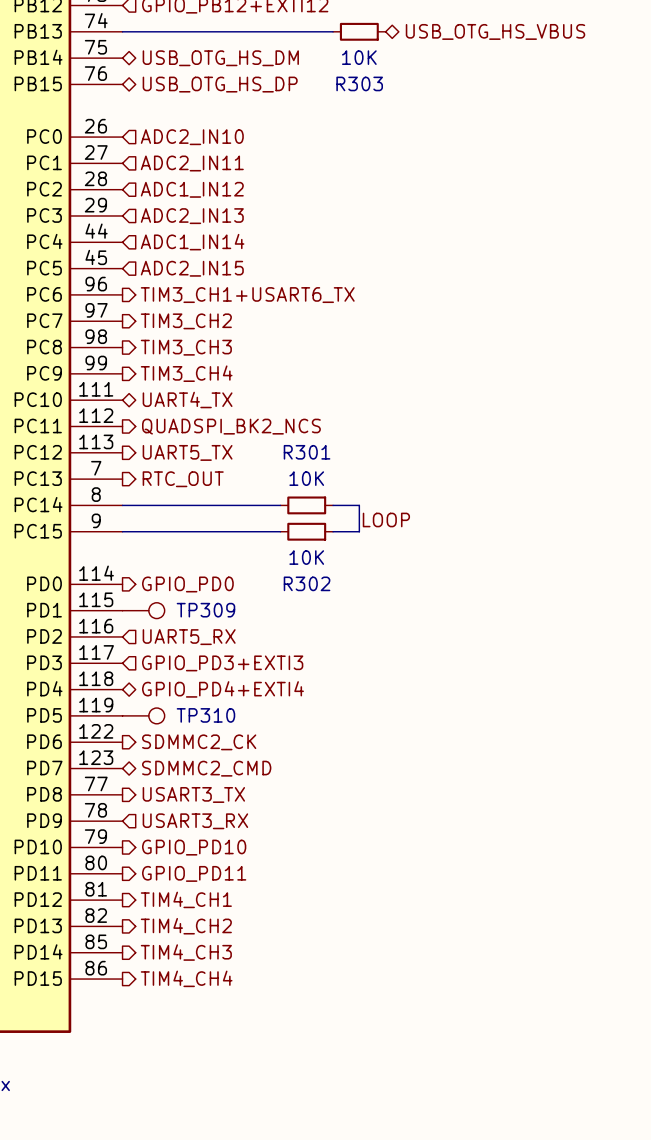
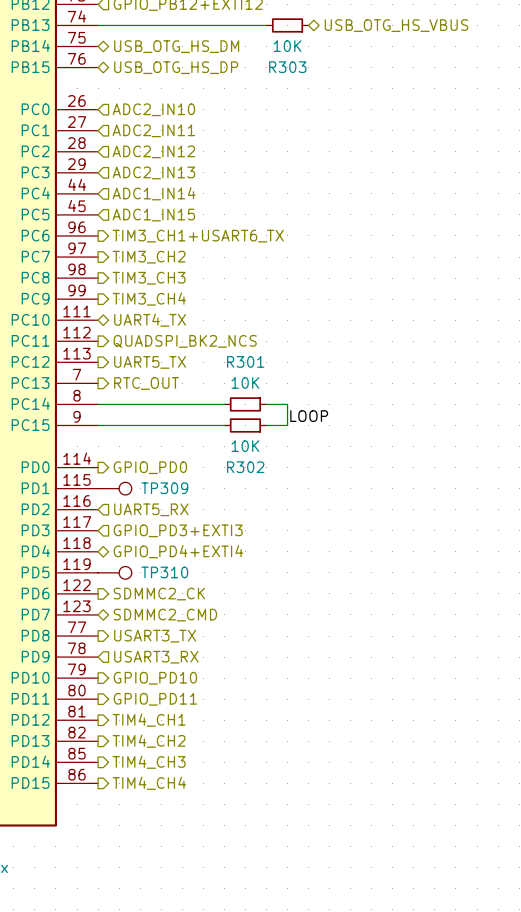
hierarchical label: ADC1_IN12 (192, 189) -> ADC2_IN12 (153, 151)
hierarchical label: ADC2_IN15 (192, 268) -> ADC1_IN15 (153, 215)

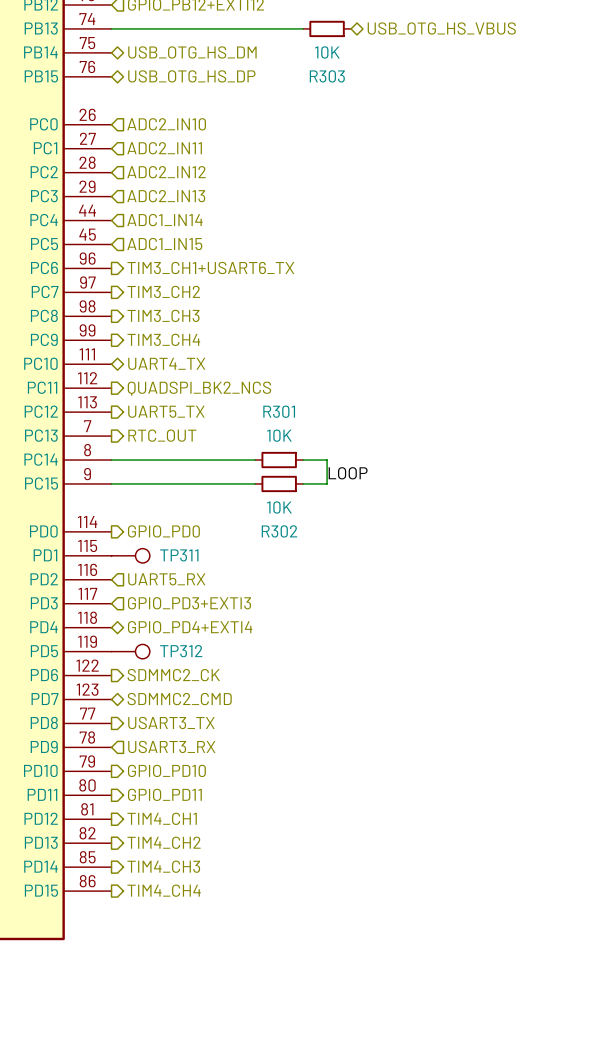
TP309 name: TP309 (164, 488) -> TP311 (179, 555)
TP310 name: TP310 (164, 572) -> TP312 (181, 651)

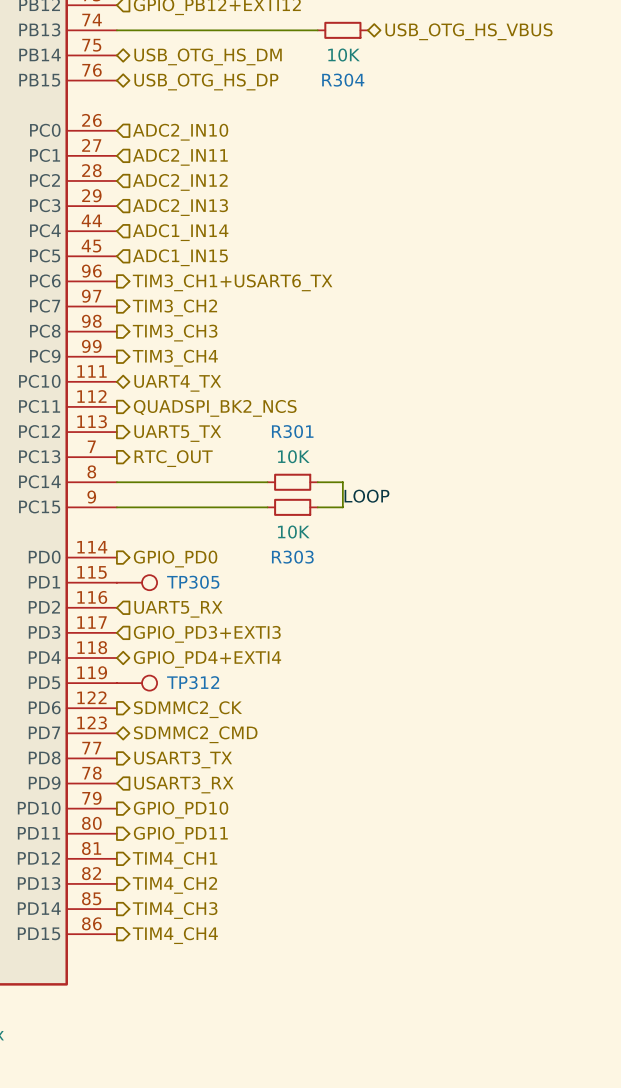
R303 name: R303 (327, 76) -> R304 (343, 80)
R302 name: R302 (279, 531) -> R303 (292, 557)
TP311 name: TP311 (179, 555) -> TP305 (193, 582)

